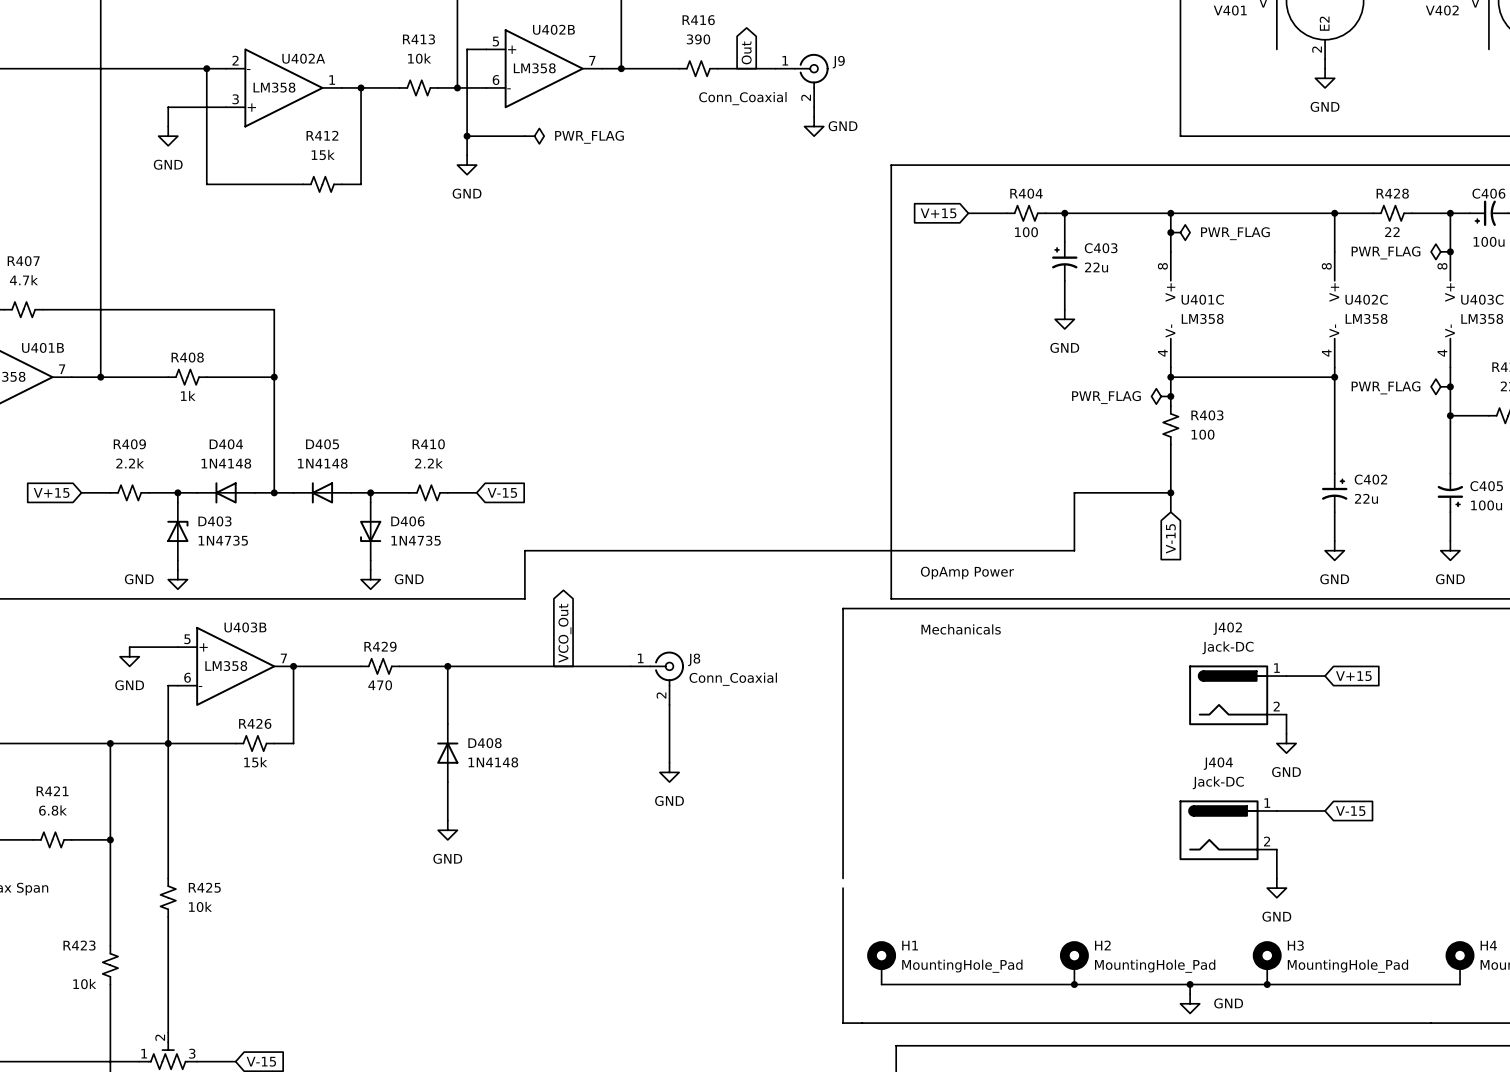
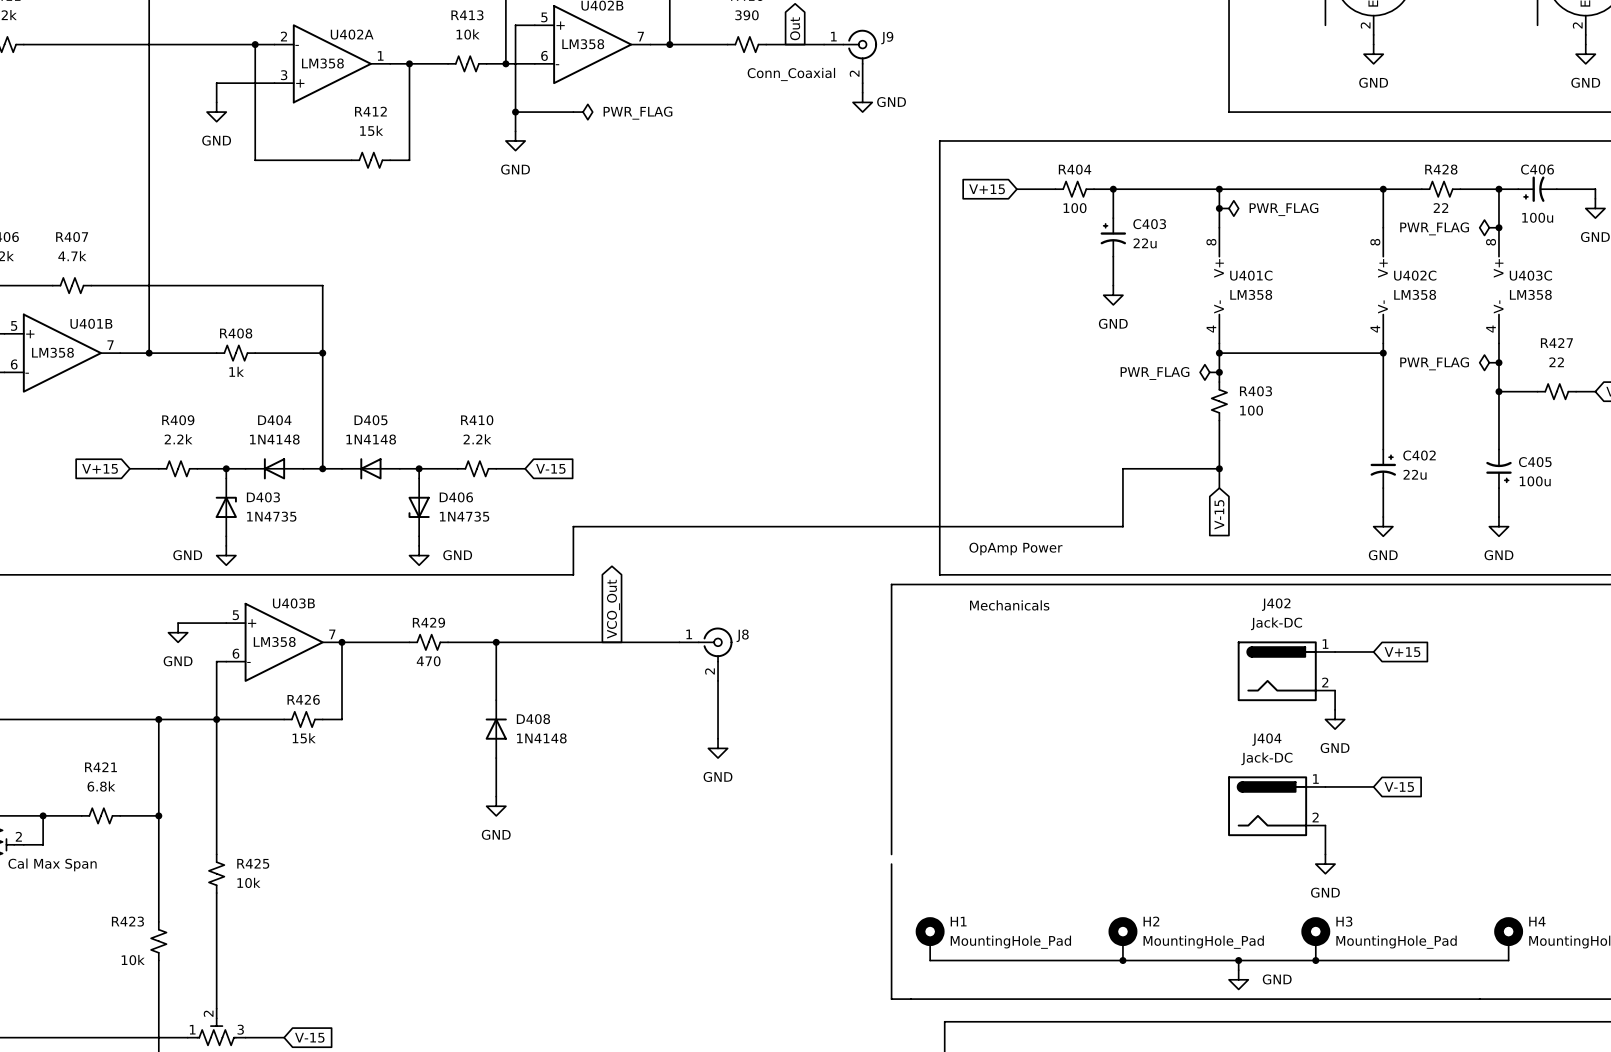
J8 value: Conn_Coaxial (733, 679) -> none

